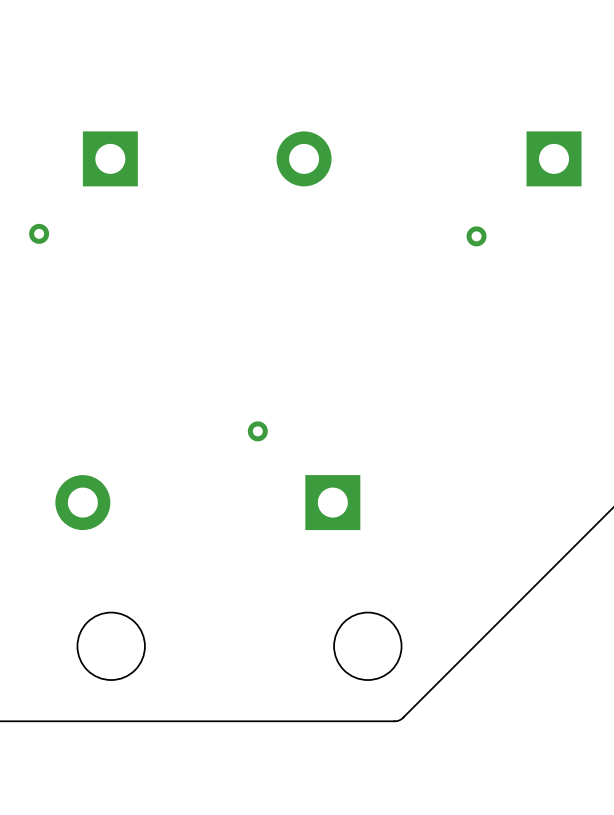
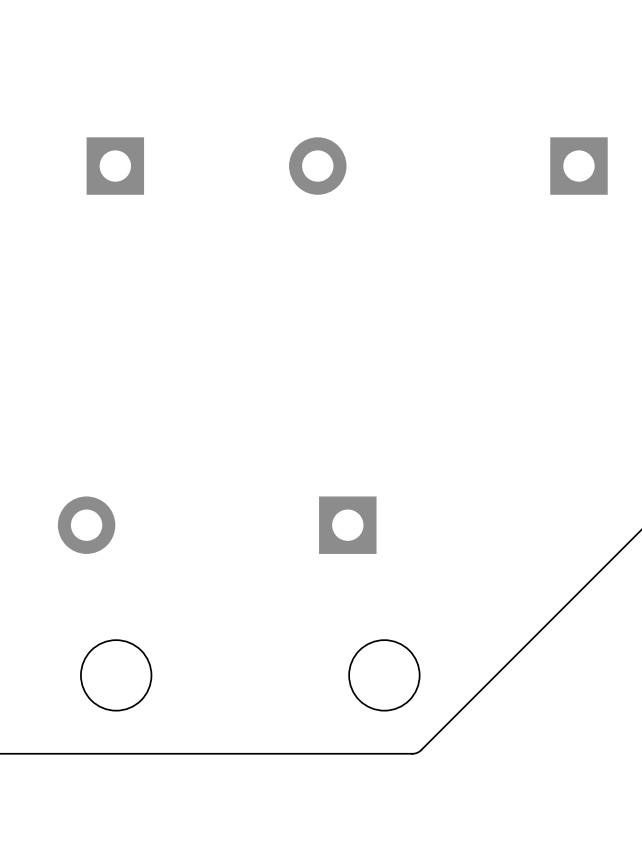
via: (39, 233) -> none
via: (476, 236) -> none
via: (257, 431) -> none

